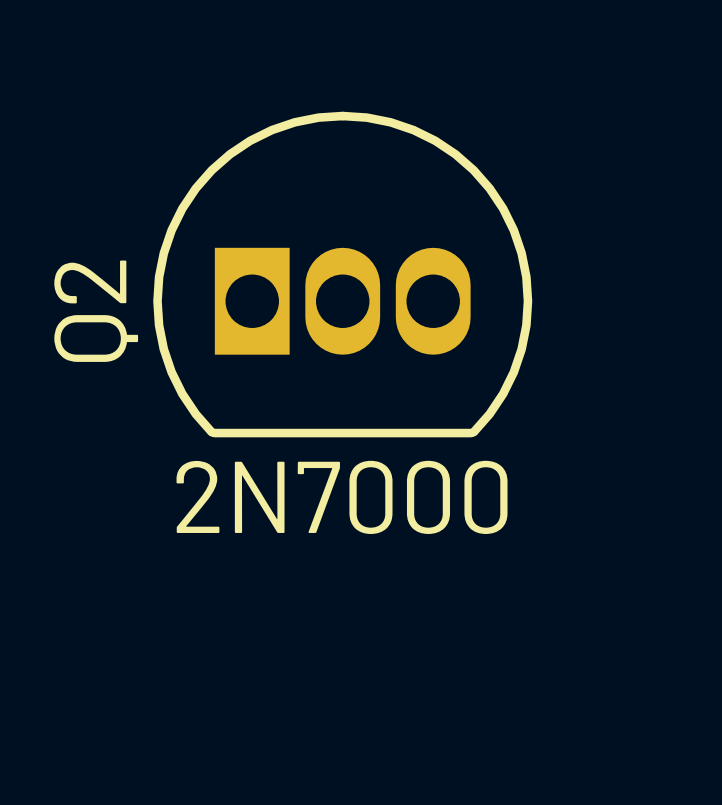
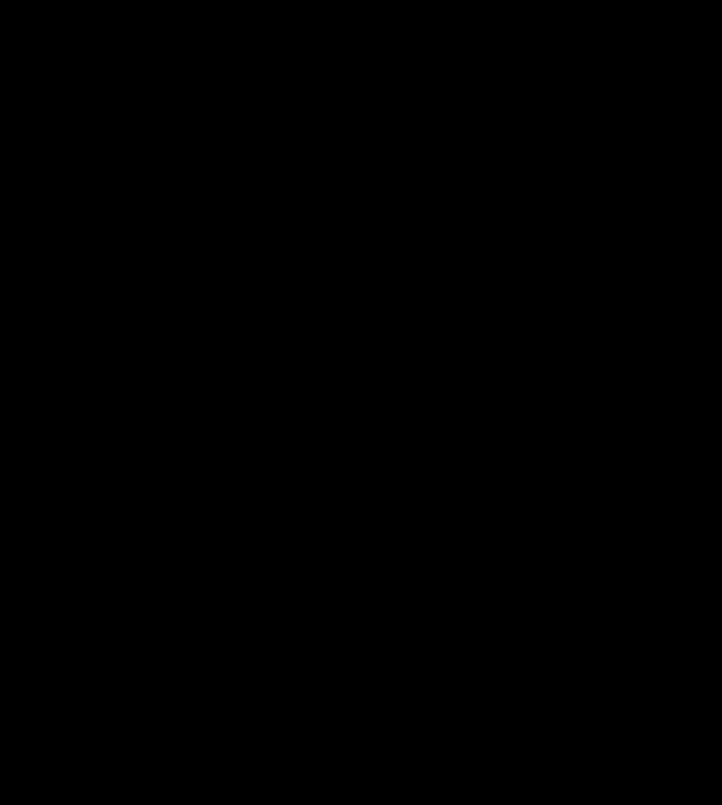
Q2: 2N7000 (342, 274) -> none

